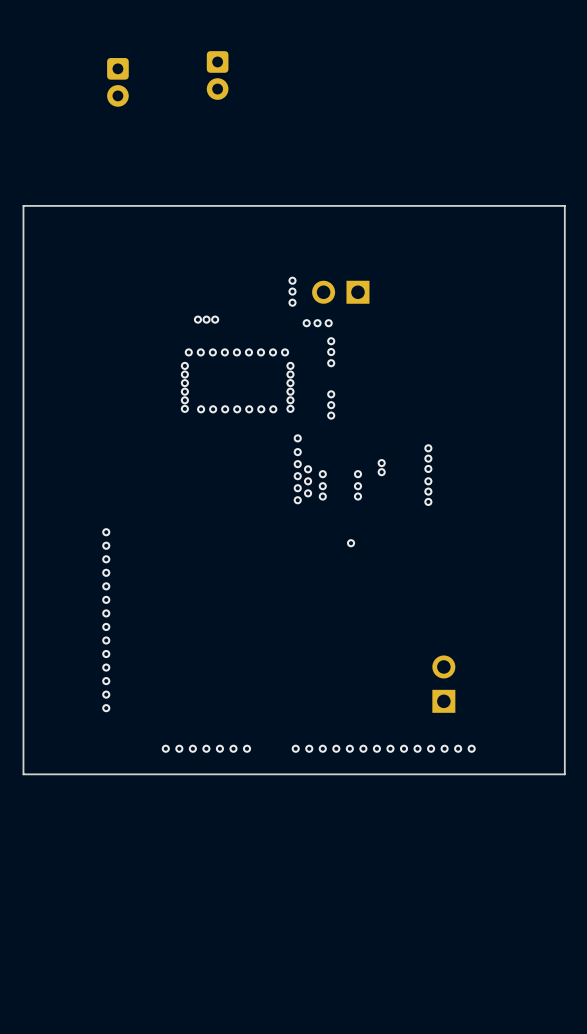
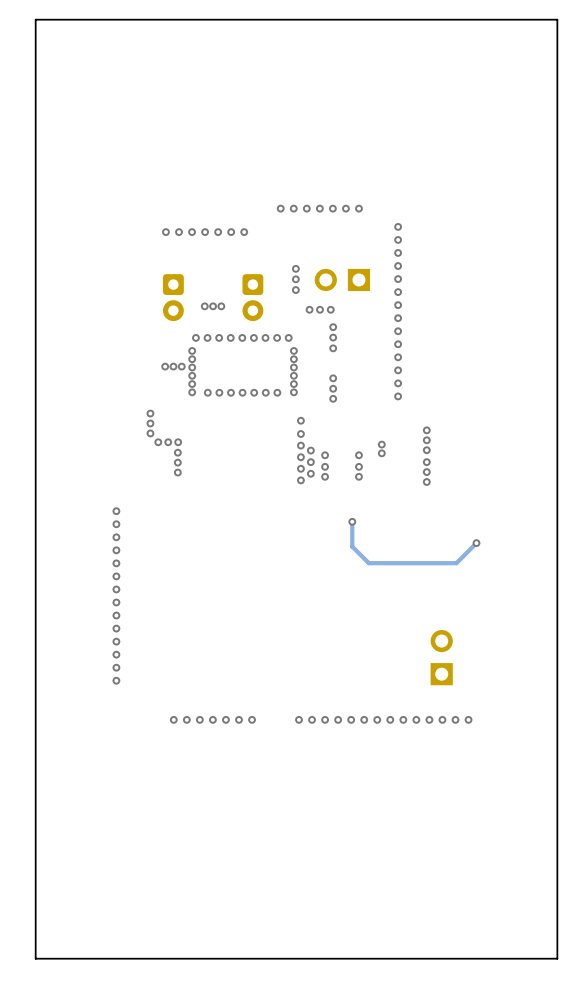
part: (217, 75) -> none
part: (117, 82) -> none
board edge: (564, 205) (23, 205) (23, 774) (564, 774) (564, 205) -> (557, 19) (557, 958) (35, 958) (35, 19) (557, 19)
via: none -> (280, 208)
via: none -> (293, 208)
via: none -> (306, 208)
via: none -> (319, 208)
via: none -> (332, 208)
via: none -> (345, 208)
via: none -> (358, 208)
via: none -> (398, 226)
via: none -> (165, 232)
via: none -> (179, 232)
via: none -> (192, 232)
via: none -> (205, 232)
via: none -> (218, 232)
via: none -> (231, 232)
via: none -> (244, 232)
via: none -> (398, 239)
via: none -> (398, 252)
via: none -> (398, 266)
via: none -> (398, 279)
via: none -> (398, 292)
part: none -> (173, 297)
part: none -> (252, 297)
via: none -> (398, 305)
via: none -> (398, 318)
via: none -> (398, 331)
via: none -> (398, 344)
via: none -> (398, 357)
via: none -> (165, 366)
via: none -> (173, 366)
via: none -> (181, 366)
via: none -> (398, 370)
via: none -> (398, 383)
via: none -> (398, 396)
via: none -> (150, 413)
via: none -> (150, 423)
via: none -> (150, 433)
via: none -> (158, 442)
via: none -> (168, 442)
via: none -> (178, 442)
via: none -> (177, 452)
via: none -> (177, 462)
via: none -> (177, 472)
track: none -> (352, 521) (352, 546) (368, 563) (456, 563) (476, 543)
via: none -> (476, 543)

